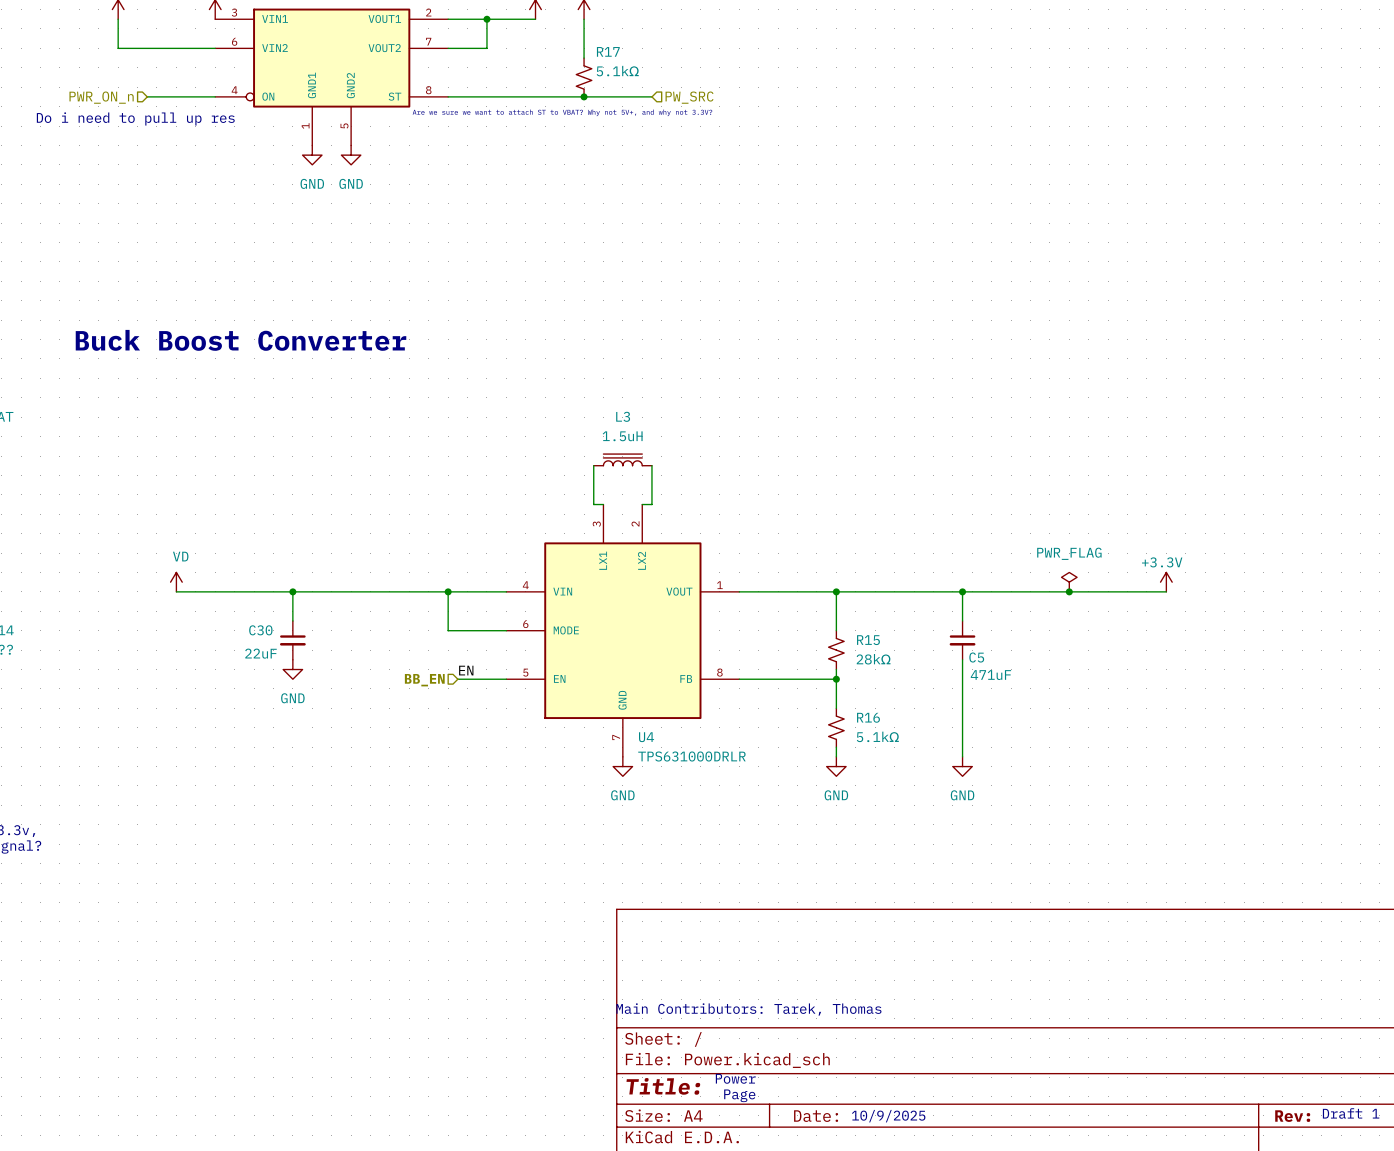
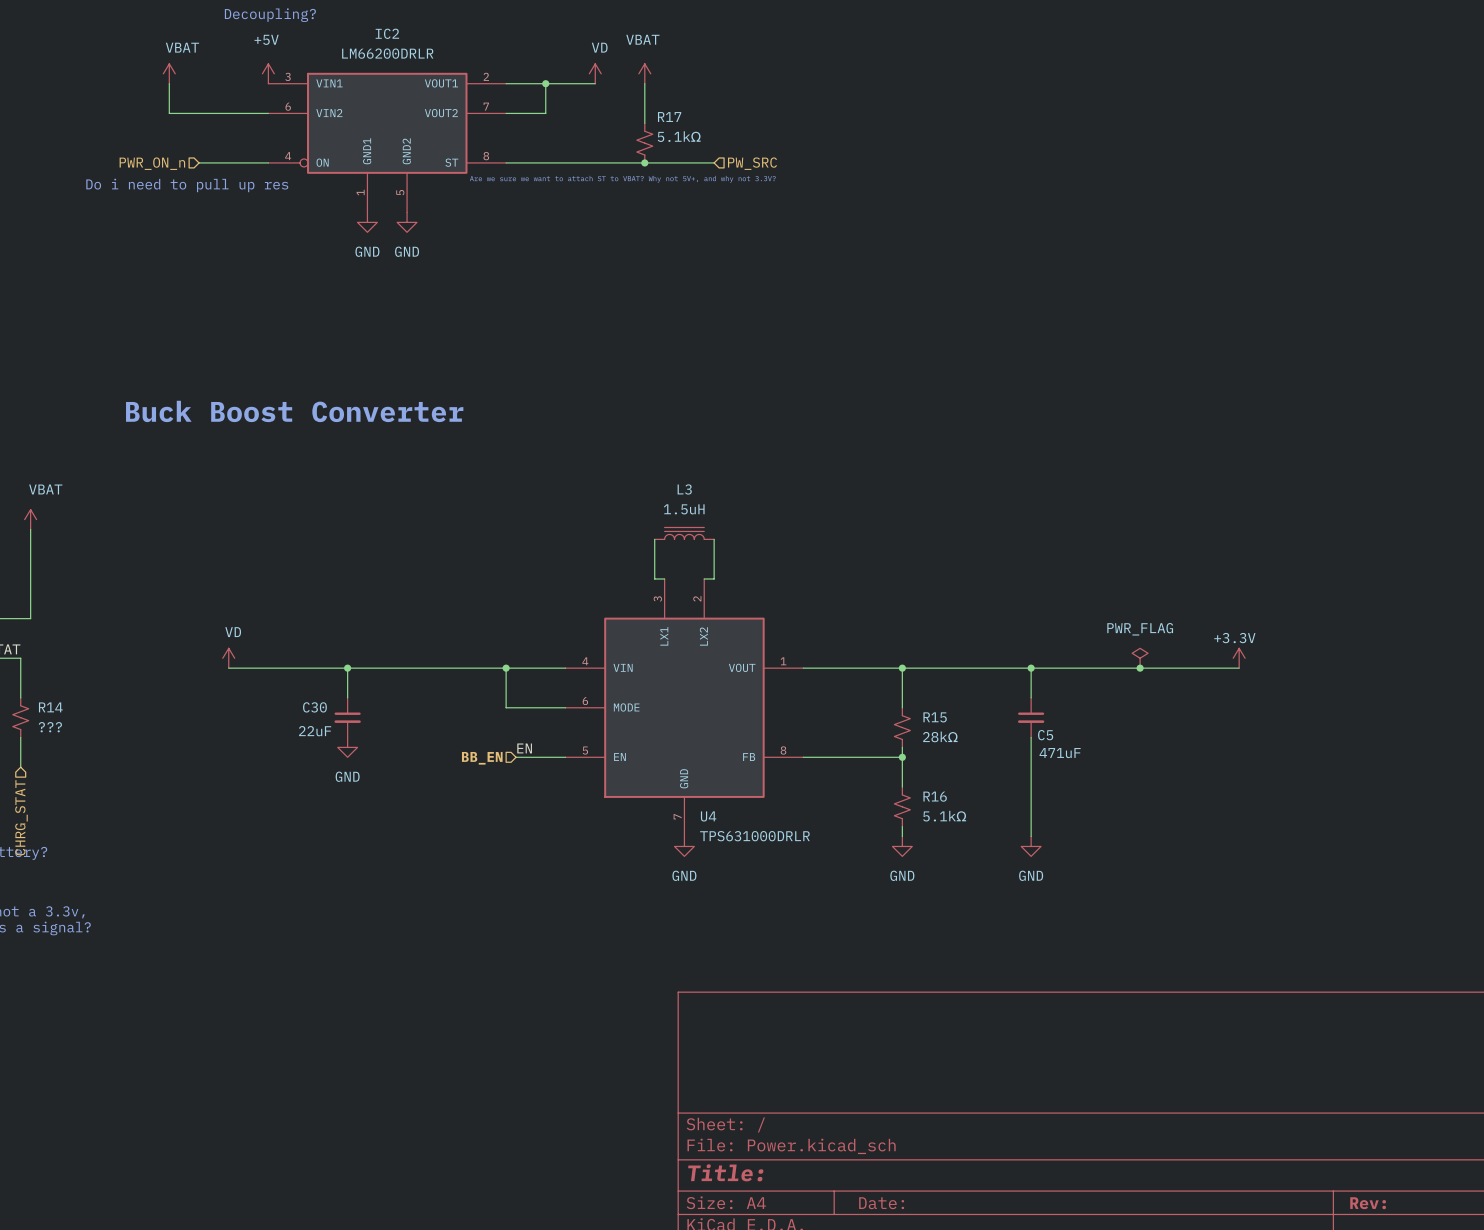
text: Main Contributors: Tarek, Thomas (748, 1009) -> none
text: Power (735, 1078) -> none
text: Page (739, 1095) -> none
text: Draft 1 (1351, 1113) -> none
text: 10/9/2025 (888, 1116) -> none

